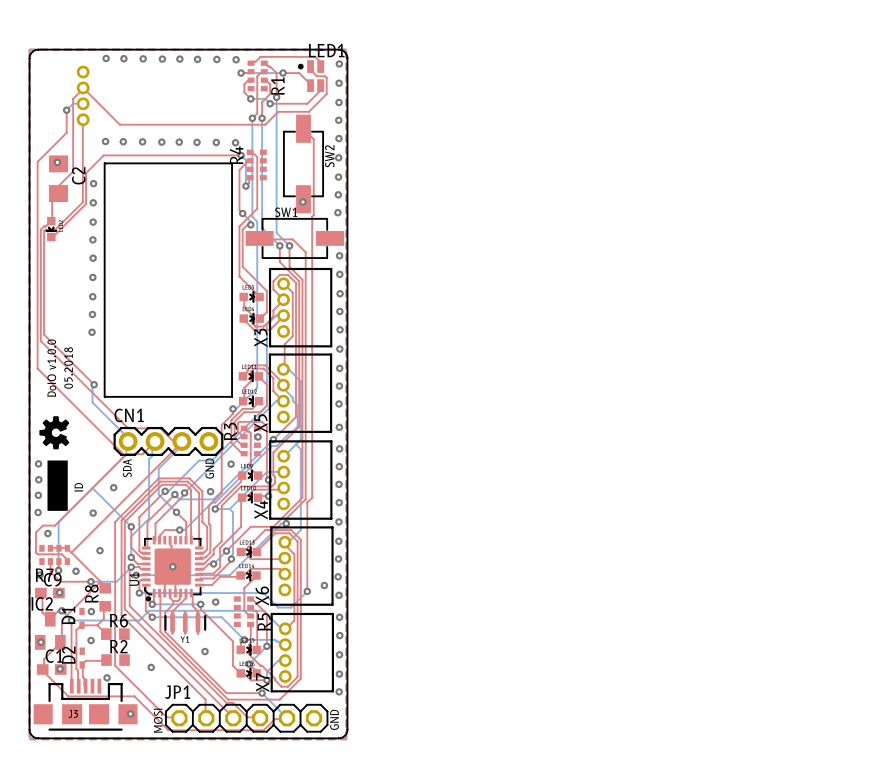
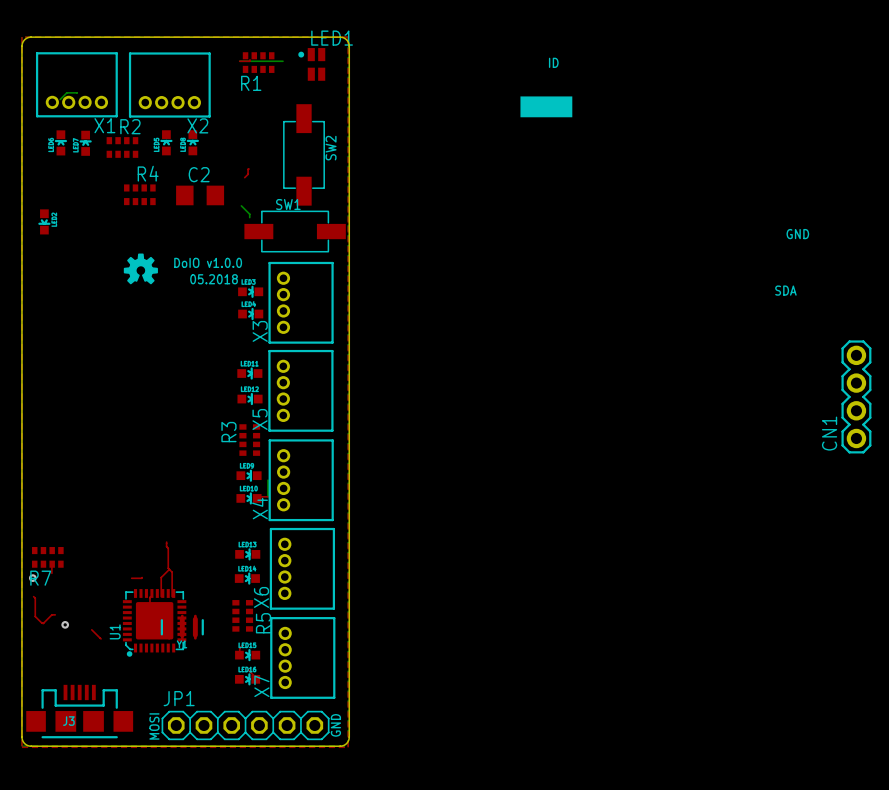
via: (106, 58) -> none
via: (123, 58) -> none
via: (143, 58) -> none
via: (162, 59) -> none
via: (179, 59) -> none
via: (197, 59) -> none
via: (216, 59) -> none
via: (236, 59) -> none
top track: (251, 63) (260, 56) (315, 56) (320, 61) (320, 66) -> none
top track: (264, 63) (276, 73) (276, 97) -> none
via: (339, 63) -> none
top track: (310, 66) (316, 76) (326, 77) (326, 94) (308, 111) (278, 111) (265, 124) (119, 124) (83, 87) (73, 98) (73, 171) (58, 186) (58, 193) (52, 199) (52, 220) (40, 229) (40, 341) (128, 428) (160, 428) (178, 446) (181, 441) (181, 442) (71, 552) -> none
top track: (264, 71) (257, 76) (257, 113) (252, 118) -> none
via: (241, 73) -> none
top track: (283, 73) (299, 73) (310, 85) -> none
via: (283, 73) -> none
text: none -> ID (553, 62)
R1 rotation: 0° (257, 75) -> 90° clockwise (258, 62)
top track: (251, 80) (244, 84) (244, 92) (250, 98) -> none
top track: (264, 80) (270, 84) (270, 94) (262, 102) (262, 118) -> none
via: (339, 83) -> none
top track: (320, 85) (320, 90) (307, 103) (270, 103) -> none
X1 side: bottom (83, 95) -> top (76, 84)
X2: none -> (169, 85)
bottom track: (276, 97) (276, 232) (289, 245) -> none
via: (276, 97) -> none
bottom track: (250, 98) (265, 98) (270, 103) -> none
via: (250, 98) -> none
via: (339, 102) -> none
via: (270, 103) -> none
drawing: none -> [520, 96, 573, 118]
top track: (66, 110) (66, 132) (37, 161) (37, 368) (124, 455) -> none
via: (66, 110) -> none
bottom track: (252, 118) (252, 216) (257, 221) (257, 387) (236, 408) (233, 408) -> none
via: (252, 118) -> none
bottom track: (262, 118) (262, 228) (279, 245) -> none
via: (262, 118) -> none
top track: (83, 119) (82, 202) (55, 229) (44, 231) (44, 334) (94, 384) -> none
via: (338, 120) -> none
top track: (303, 128) (313, 139) (312, 497) (307, 502) (307, 591) -> none
via: (338, 138) -> none
via: (105, 141) -> none
via: (123, 141) -> none
via: (142, 141) -> none
via: (161, 142) -> none
via: (179, 142) -> none
via: (197, 142) -> none
via: (216, 142) -> none
via: (235, 142) -> none
part: none -> (60, 142)
part: none -> (85, 143)
part: none -> (166, 142)
part: none -> (192, 142)
top track: (250, 152) (257, 157) (257, 208) (239, 226) (239, 276) (259, 296) -> none
top track: (241, 155) (103, 155) (86, 173) (86, 203) (51, 237) -> none
bottom track: (241, 155) (245, 160) (245, 186) -> none
via: (241, 155) -> none
via: (338, 157) -> none
top track: (250, 160) (239, 169) (239, 210) (242, 213) -> none
via: (57, 162) -> none
board edge: (104, 163) (232, 163) (232, 396) (104, 396) (104, 163) -> none
R4 rotation: 0° (256, 165) -> 90° clockwise (139, 194)
R4 position: (256, 165) -> (139, 194)
C2 name position: C2 (78, 175) -> C2 (199, 174)
via: (338, 177) -> none
C2 rotation: 0° (58, 178) -> 90° clockwise (200, 195)
C2 position: (58, 178) -> (200, 195)
via: (93, 183) -> none
via: (245, 186) -> none
via: (338, 194) -> none
via: (93, 202) -> none
via: (302, 202) -> none
via: (337, 212) -> none
via: (242, 213) -> none
via: (93, 222) -> none
top track: (250, 224) (247, 224) (242, 229) (242, 266) (266, 291) (266, 312) (259, 318) -> none
via: (250, 224) -> none
top track: (259, 238) (292, 239) (305, 252) (305, 499) (286, 518) (286, 523) -> none
via: (92, 239) -> none
text: none -> GND (797, 234)
top track: (279, 245) (279, 261) (299, 281) (299, 426) (273, 452) (274, 483) (271, 486) (241, 486) (221, 505) (221, 541) (213, 549) (213, 554) (203, 563) (199, 563) -> none
via: (279, 245) -> none
top track: (289, 245) (289, 266) (302, 279) (302, 497) (273, 526) (250, 526) (226, 551) -> none
via: (289, 245) -> none
via: (339, 255) -> none
via: (93, 258) -> none
drawing: none -> [123, 253, 158, 285]
via: (339, 274) -> none
via: (92, 277) -> none
top track: (283, 283) (292, 292) (292, 336) (284, 344) (283, 369) -> none
via: (340, 293) -> none
text: none -> SDA (785, 290)
via: (92, 296) -> none
top track: (243, 296) (244, 307) (252, 315) (252, 323) (255, 326) (263, 326) (273, 316) (273, 310) (283, 299) (273, 289) (273, 281) (279, 274) (287, 274) (295, 282) (295, 417) (273, 439) -> none
via: (339, 311) -> none
via: (92, 314) -> none
top track: (283, 315) (270, 329) (254, 329) (243, 318) -> none
bottom track: (283, 315) (276, 315) (266, 324) (266, 405) (212, 460) (199, 460) (168, 491) (165, 491) -> none
via: (340, 329) -> none
via: (92, 332) -> none
via: (339, 349) -> none
text rotation: 0° (51, 368) -> 90° clockwise (208, 262)
text position: DoIO v1.0.0 (51, 368) -> DoIO v1.0.0 (208, 262)
text rotation: 0° (68, 368) -> 90° clockwise (214, 279)
text position: 05.2018 (68, 368) -> 05.2018 (214, 279)
via: (339, 368) -> none
bottom track: (283, 369) (289, 370) (300, 381) (300, 439) (283, 456) -> none
top track: (242, 376) (252, 365) (265, 365) (283, 385) -> none
top track: (258, 376) (266, 384) (266, 405) (260, 412) (244, 412) (234, 421) (234, 438) (244, 445) -> none
bottom track: (94, 384) (92, 402) (128, 438) (126, 454) (58, 521) (58, 570) -> none
via: (94, 384) -> none
bottom track: (283, 385) (297, 405) (297, 426) (276, 446) (271, 446) (215, 502) (212, 502) (184, 530) (179, 530) -> none
via: (339, 386) -> none
top track: (243, 401) (244, 387) (250, 381) (250, 371) (254, 368) (263, 368) (273, 378) (273, 391) (283, 401) -> none
top track: (259, 401) (252, 408) (242, 408) (231, 420) (231, 442) (244, 453) -> none
bottom track: (283, 401) (276, 400) (184, 492) -> none
via: (339, 403) -> none
top track: (233, 408) (233, 413) (221, 425) (221, 492) (208, 505) (210, 552) (205, 557) (199, 558) -> none
via: (233, 408) -> none
CN1 name position: CN1 (129, 415) -> CN1 (829, 433)
drawing: [39, 416, 70, 511] -> none
via: (339, 427) -> none
top track: (244, 428) (250, 433) (250, 468) (258, 475) -> none
top track: (244, 436) (237, 431) (239, 421) (262, 421) (266, 426) (266, 478) (268, 479) -> none
via: (258, 436) -> none
bottom track: (273, 439) (213, 499) (179, 499) (174, 494) -> none
via: (273, 439) -> none
top track: (155, 441) (142, 454) (124, 455) -> none
bottom track: (155, 441) (152, 444) (152, 455) (149, 459) (149, 518) (131, 536) (131, 557) -> none
CN1 rotation: 0° (168, 441) -> 90° clockwise (856, 396)
CN1 position: (168, 441) -> (856, 396)
bottom track: (181, 441) (181, 446) (158, 468) (158, 494) (176, 512) -> none
bottom track: (295, 444) (300, 449) (300, 530) (289, 541) (284, 542) -> none
via: (339, 448) -> none
top track: (124, 455) (55, 525) (42, 525) (36, 532) (37, 554) (61, 554) (67, 561) -> none
via: (38, 463) -> none
via: (231, 464) -> none
via: (339, 466) -> none
text: SDA (127, 468) -> none
text: GND (209, 468) -> none
bottom track: (283, 472) (266, 471) (229, 509) -> none
top track: (242, 475) (241, 481) (215, 509) -> none
via: (38, 479) -> none
via: (268, 479) -> none
via: (339, 484) -> none
text: ID (78, 487) -> none
via: (113, 487) -> none
top track: (283, 487) (281, 489) (254, 489) (247, 496) (241, 497) (241, 526) (220, 547) (220, 567) (213, 573) (199, 574) -> none
bottom track: (92, 488) (131, 526) -> none
top track: (165, 491) (139, 517) (139, 551) (146, 553) -> none
via: (165, 491) -> none
via: (210, 491) -> none
top track: (184, 492) (155, 523) (154, 540) -> none
via: (184, 492) -> none
top track: (174, 494) (147, 521) (146, 548) -> none
via: (174, 494) -> none
via: (38, 495) -> none
via: (268, 496) -> none
via: (339, 502) -> none
bottom track: (215, 509) (229, 509) -> none
via: (215, 509) -> none
bottom track: (229, 509) (233, 512) (231, 559) -> none
via: (38, 512) -> none
top track: (176, 512) (186, 521) (185, 540) -> none
via: (176, 512) -> none
via: (93, 513) -> none
via: (338, 521) -> none
bottom track: (286, 523) (281, 523) (229, 575) (136, 575) -> none
via: (286, 523) -> none
top track: (131, 526) (131, 547) (140, 557) (146, 558) -> none
via: (131, 526) -> none
top track: (179, 530) (165, 530) (160, 534) (159, 540) -> none
via: (179, 530) -> none
via: (47, 533) -> none
top track: (191, 540) (191, 489) (186, 484) (161, 484) (124, 521) (124, 609) (233, 718) -> none
via: (338, 541) -> none
top track: (284, 542) (294, 554) (294, 620) (285, 628) -> none
top track: (50, 548) (66, 547) (105, 588) -> none
top track: (199, 548) (199, 492) (187, 481) (160, 481) (121, 520) (121, 615) (205, 699) (206, 718) -> none
via: (100, 550) -> none
bottom track: (226, 551) (213, 563) -> none
via: (226, 551) -> none
top track: (256, 552) (274, 533) (289, 533) (297, 541) (297, 677) (287, 686) (281, 686) (249, 654) (250, 624) -> none
top track: (199, 553) (207, 549) (207, 526) (202, 521) (202, 491) (189, 478) (158, 478) (115, 521) (115, 665) (166, 717) (179, 718) -> none
top track: (131, 557) (137, 563) (146, 563) -> none
via: (131, 557) -> none
top track: (284, 558) (250, 559) (240, 552) (242, 552) (265, 530) (291, 530) (300, 539) (300, 678) (279, 699) (228, 699) (160, 631) (159, 593) -> none
via: (338, 558) -> none
top track: (231, 559) (213, 578) (199, 579) -> none
via: (231, 559) -> none
top track: (50, 561) (50, 572) (60, 581) (90, 581) -> none
top track: (213, 563) (208, 563) (203, 568) (199, 569) -> none
via: (213, 563) -> none
via: (172, 566) -> none
bottom track: (131, 567) (116, 581) (90, 581) -> none
via: (131, 567) -> none
U1 position: (172, 568) -> (154, 622)
top track: (146, 569) (139, 567) (129, 568) (129, 605) (226, 702) (233, 702) (247, 717) (260, 718) -> none
via: (58, 570) -> none
via: (76, 571) -> none
top track: (284, 574) (279, 568) (250, 568) (244, 575) (239, 576) (220, 576) (212, 584) (199, 585) -> none
via: (136, 575) -> none
top track: (256, 575) (244, 588) (244, 610) (250, 615) -> none
via: (338, 576) -> none
top track: (146, 579) (139, 581) (139, 593) -> none
via: (90, 581) -> none
top track: (100, 581) (61, 620) (61, 641) (44, 659) (42, 670) (68, 696) (134, 696) (168, 730) (263, 730) (274, 718) (287, 718) -> none
top track: (146, 585) (145, 610) (152, 617) -> none
via: (324, 585) -> none
bottom track: (307, 591) (291, 607) (278, 607) (263, 593) (139, 593) -> none
via: (307, 591) -> none
via: (59, 592) -> none
C9: (49, 593) -> none
via: (139, 593) -> none
top track: (170, 593) (170, 597) (173, 601) -> none
top track: (180, 593) (179, 599) (173, 601) -> none
top track: (185, 593) (186, 597) (173, 610) (172, 622) -> none
top track: (191, 593) (192, 605) (197, 610) (197, 622) -> none
via: (339, 595) -> none
R8: (105, 597) -> none
top track: (250, 599) (266, 614) (266, 646) -> none
top track: (173, 601) (173, 604) (165, 612) (165, 631) (226, 693) (262, 693) -> none
via: (215, 602) -> none
bottom track: (152, 604) (200, 604) -> none
via: (152, 604) -> none
top track: (200, 604) (200, 609) (233, 641) (233, 665) (250, 680) (266, 680) -> none
via: (200, 604) -> none
top track: (105, 606) (103, 618) (97, 625) (81, 625) (76, 630) (76, 668) (78, 686) -> none
top track: (250, 607) (257, 612) (256, 649) -> none
bottom track: (61, 610) (71, 620) (139, 620) (149, 610) (263, 610) (281, 628) (285, 628) -> none
via: (61, 610) -> none
via: (91, 611) -> none
bottom track: (152, 617) (221, 617) (244, 639) (274, 639) (285, 644) -> none
via: (152, 617) -> none
via: (339, 617) -> none
D1: (81, 618) -> none
top track: (71, 620) (71, 686) -> none
IC2: (50, 630) -> none
R6: (115, 634) -> none
via: (339, 635) -> none
via: (244, 639) -> none
via: (91, 640) -> none
via: (40, 642) -> none
bottom track: (266, 646) (249, 664) -> none
via: (266, 646) -> none
via: (205, 651) -> none
R2 footprint: [101, 654, 130, 666] -> [106, 137, 139, 158]
via: (339, 654) -> none
D2: (82, 658) -> none
top track: (106, 660) (86, 660) (82, 664) (82, 677) (85, 686) -> none
bottom track: (285, 660) (278, 660) (266, 672) (266, 680) -> none
via: (249, 664) -> none
via: (151, 667) -> none
C1: (51, 669) -> none
via: (60, 669) -> none
via: (339, 674) -> none
via: (107, 677) -> none
via: (266, 680) -> none
via: (339, 691) -> none
bottom track: (262, 693) (287, 718) -> none
via: (262, 693) -> none
via: (130, 713) -> none

